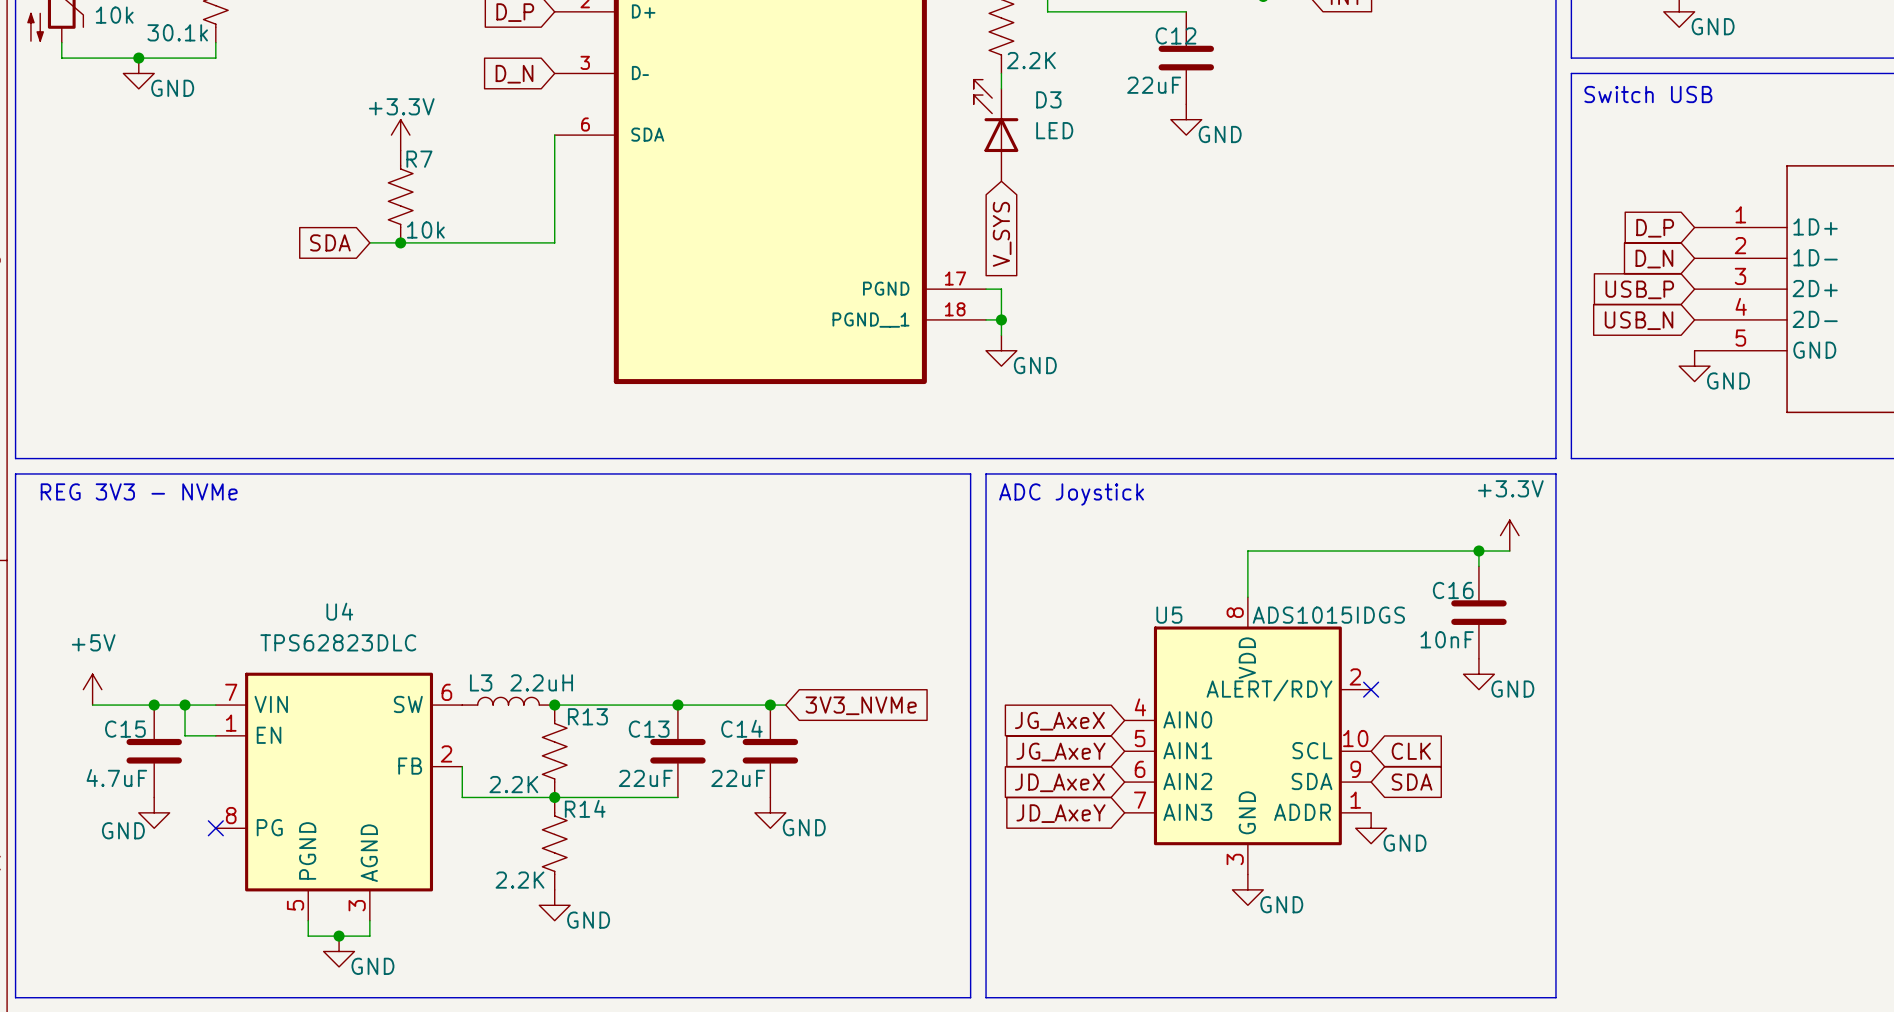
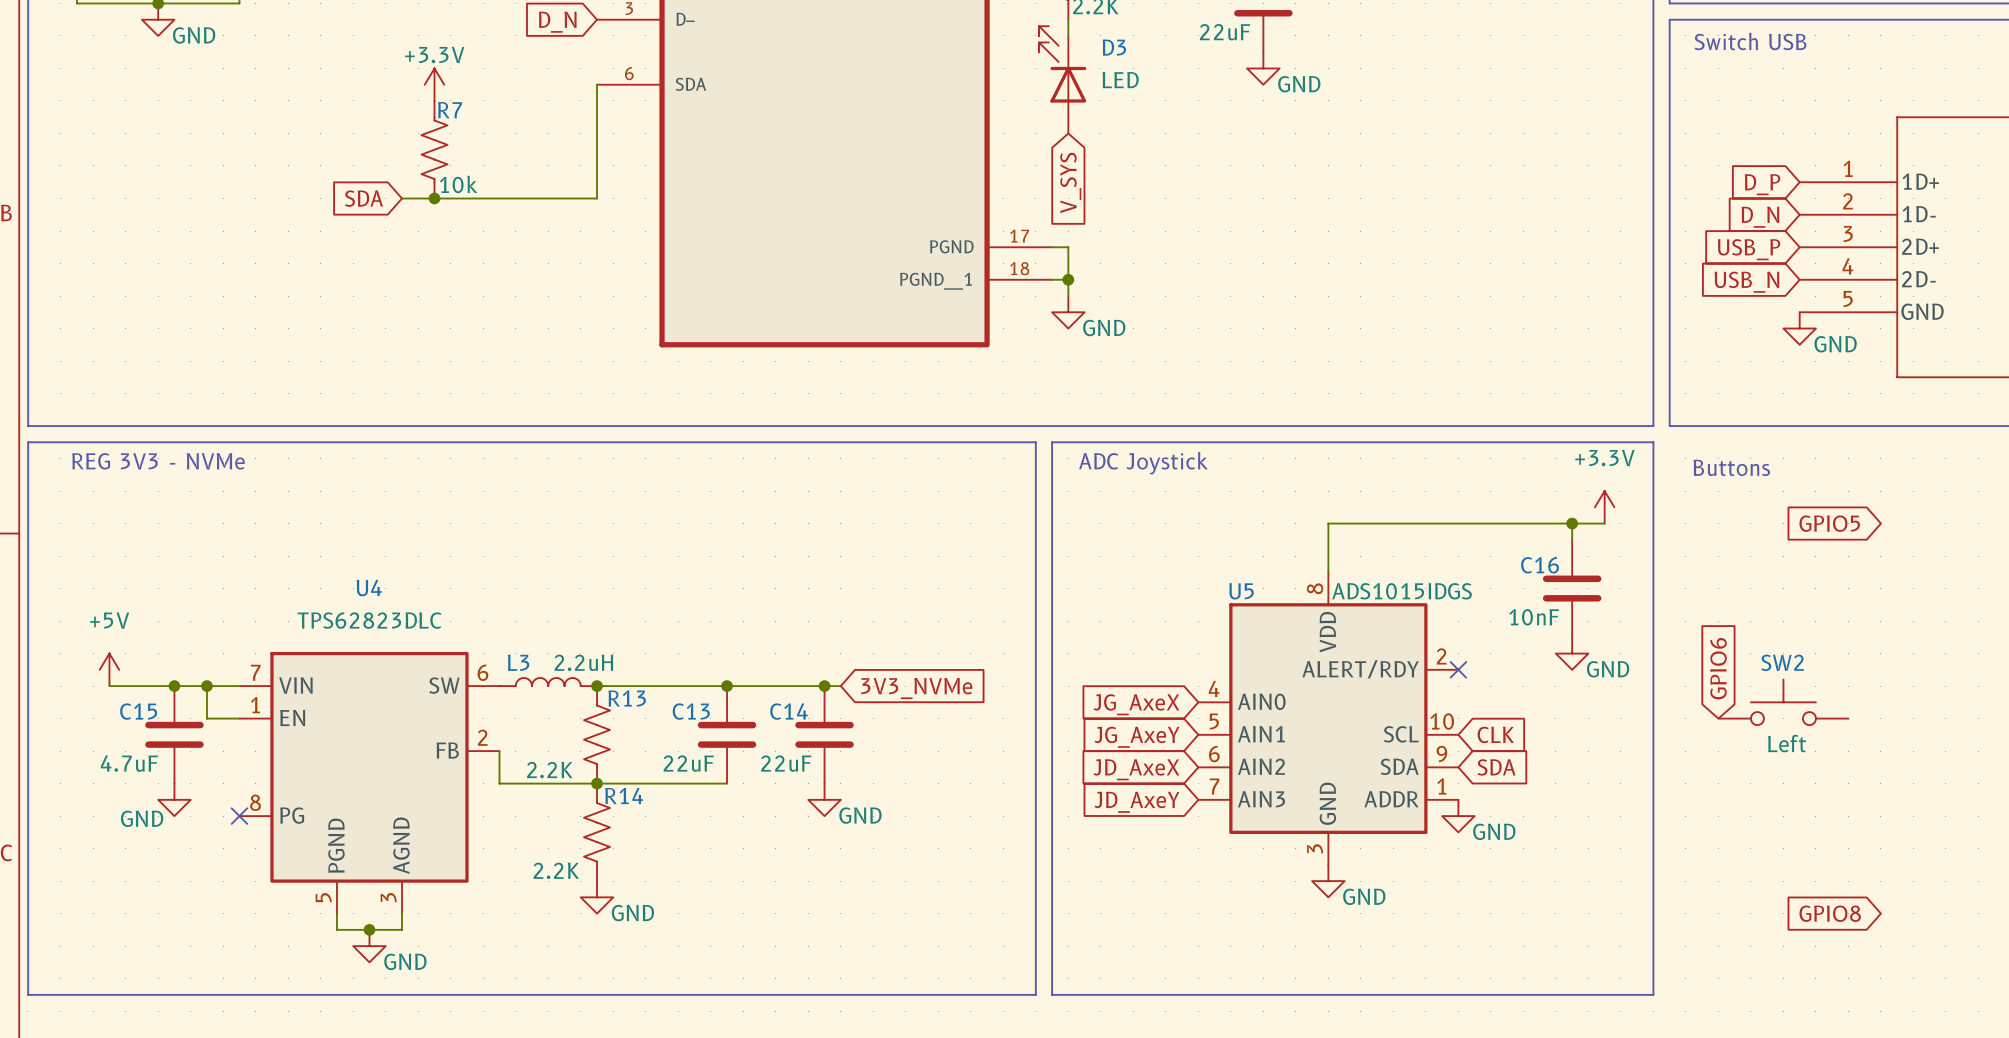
text: none -> Buttons (1731, 467)
global label: none -> GPIO5 (1829, 523)
global label: none -> GPIO6 (1718, 668)
SW2: none -> Left (1783, 702)
global label: none -> GPIO8 (1830, 913)

